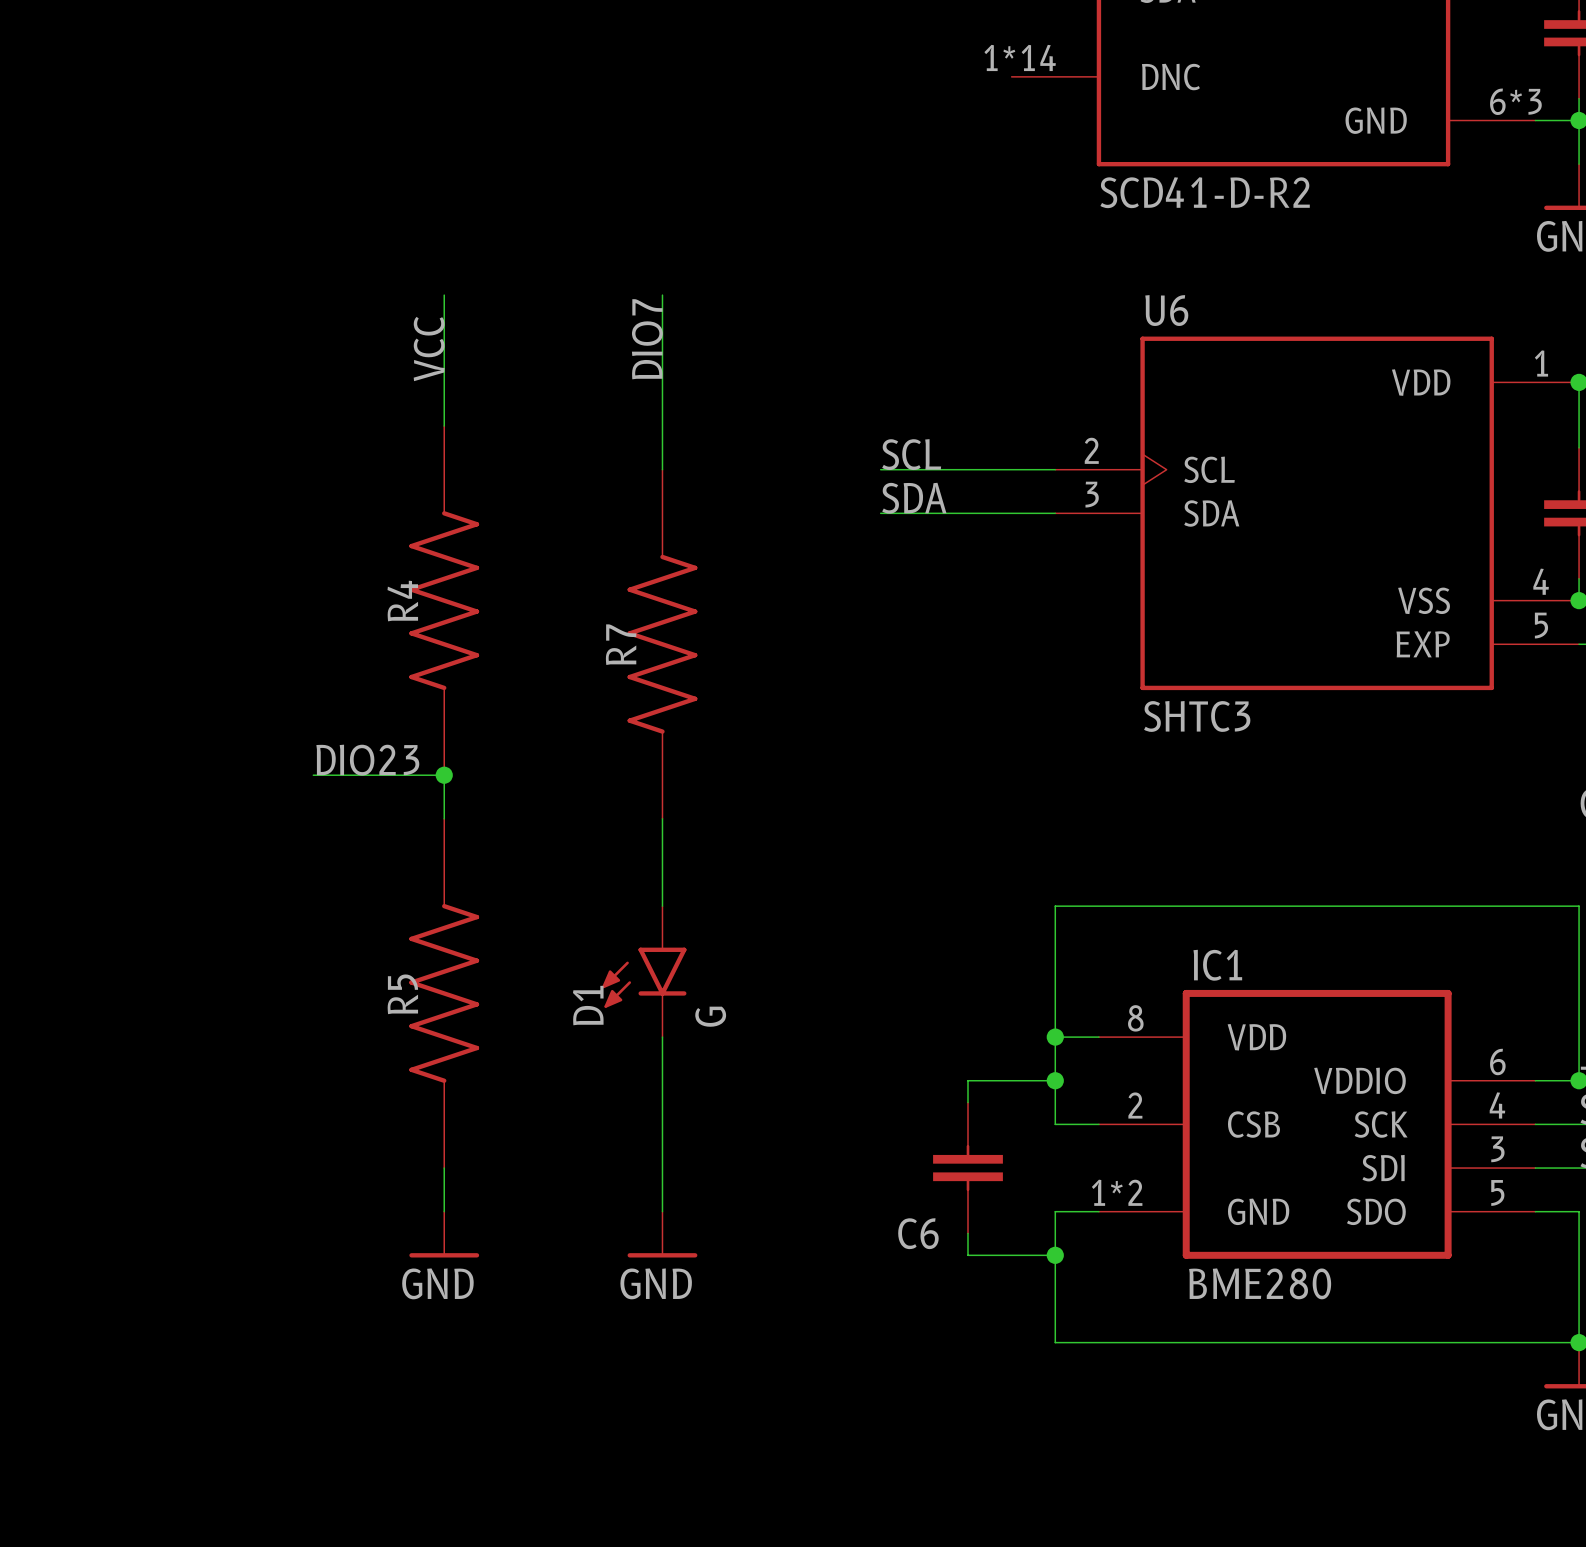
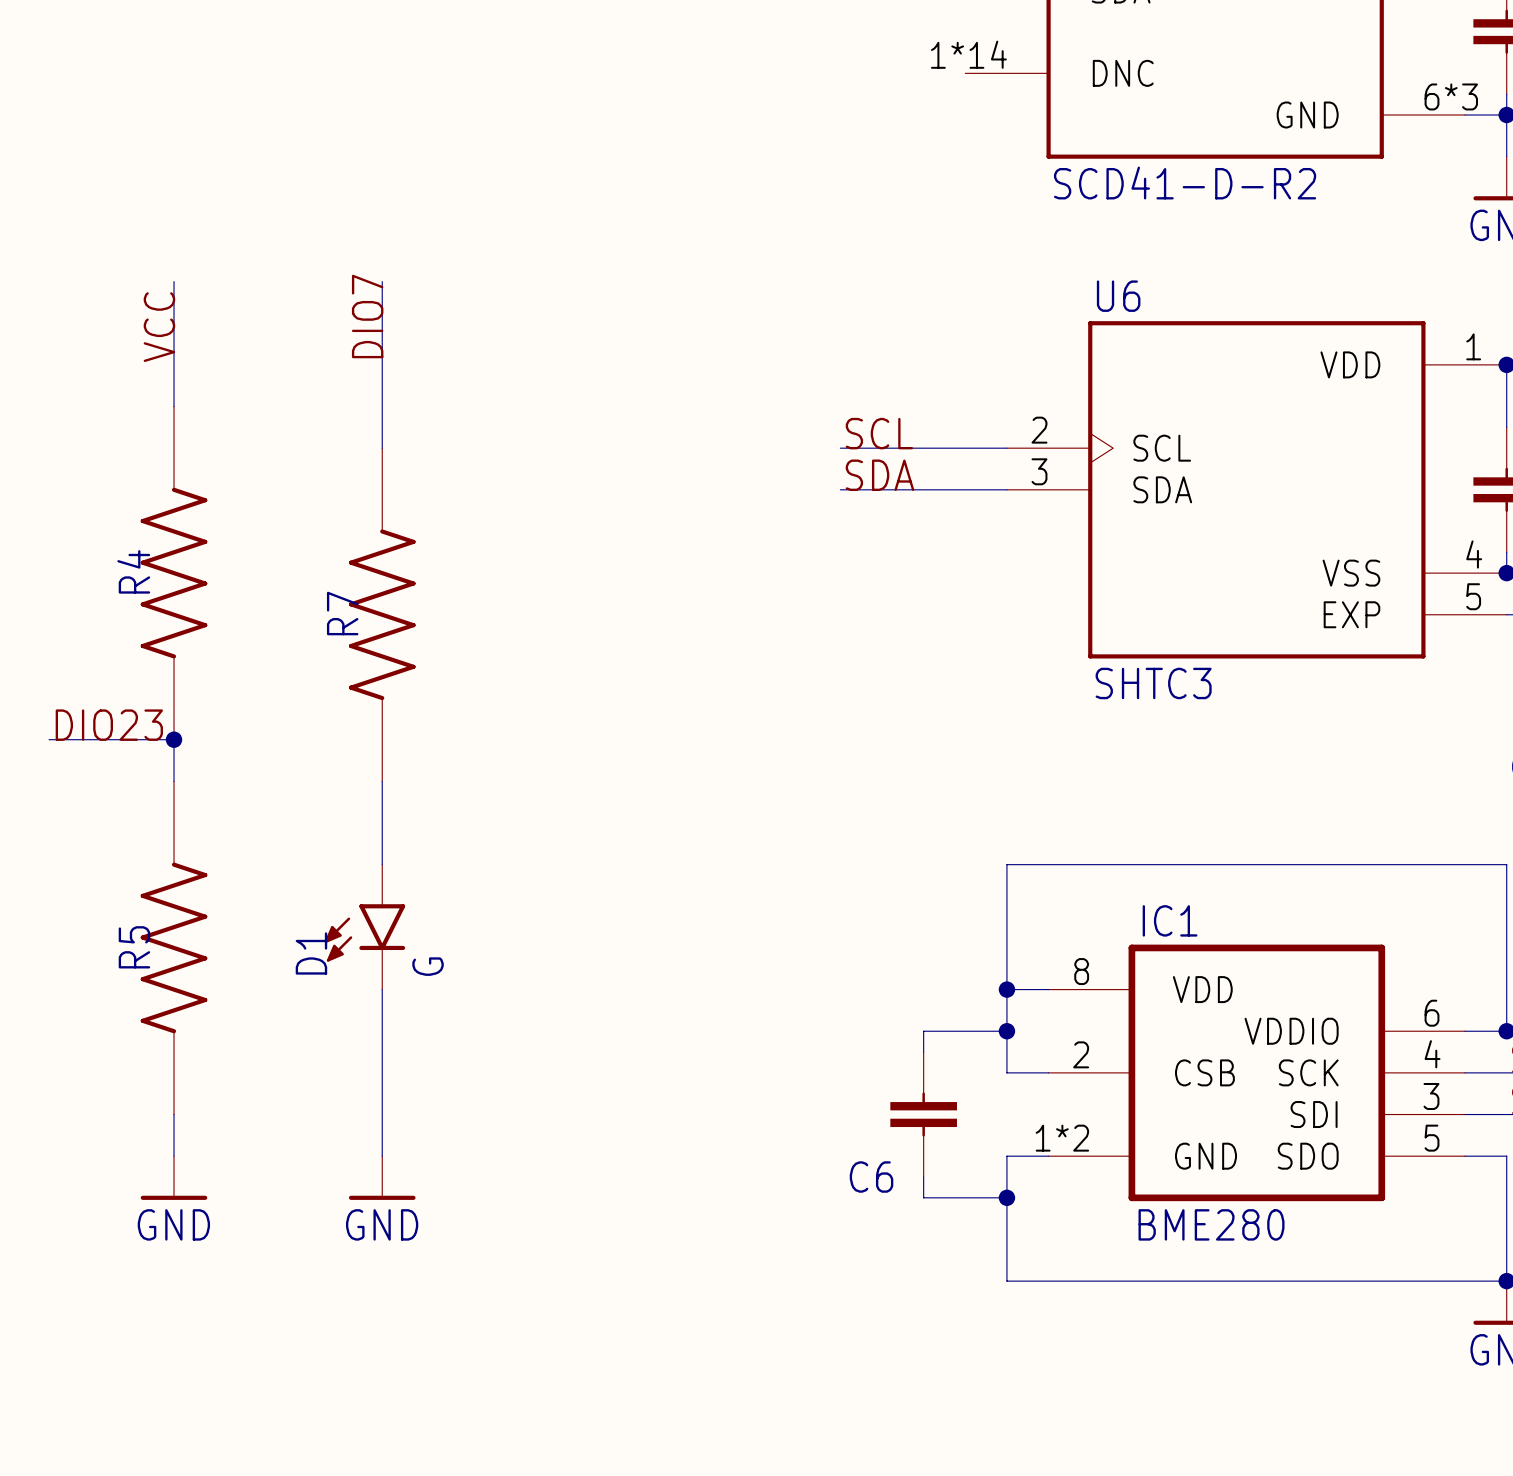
wire: (444, 295) (444, 426) -> (174, 281) (174, 406)
wire: (662, 295) (662, 469) -> (382, 281) (382, 448)
label position: DIO7 (647, 339) -> DIO7 (367, 316)
label position: VCC (429, 349) -> VCC (159, 327)
R4 position: (444, 600) -> (174, 573)
R7 position: (662, 644) -> (382, 614)
label position: DIO23 (367, 760) -> DIO23 (109, 725)
junction: none -> (174, 739)
wire: (313, 775) (444, 775) (444, 818) -> (49, 739) (174, 739) (174, 781)
junction: (444, 775) -> none
wire: (662, 818) (662, 906) -> (382, 781) (382, 864)
D1 position: (644, 971) -> (364, 927)
R5 position: (444, 993) -> (174, 947)
wire: (662, 1037) (662, 1211) -> (382, 989) (382, 1156)
wire: (444, 1168) (444, 1211) -> (174, 1114) (174, 1156)
power symbol: none -> GND (174, 1178)
power symbol position: GND (444, 1234) -> GND (382, 1178)
power symbol: GND (662, 1234) -> none

